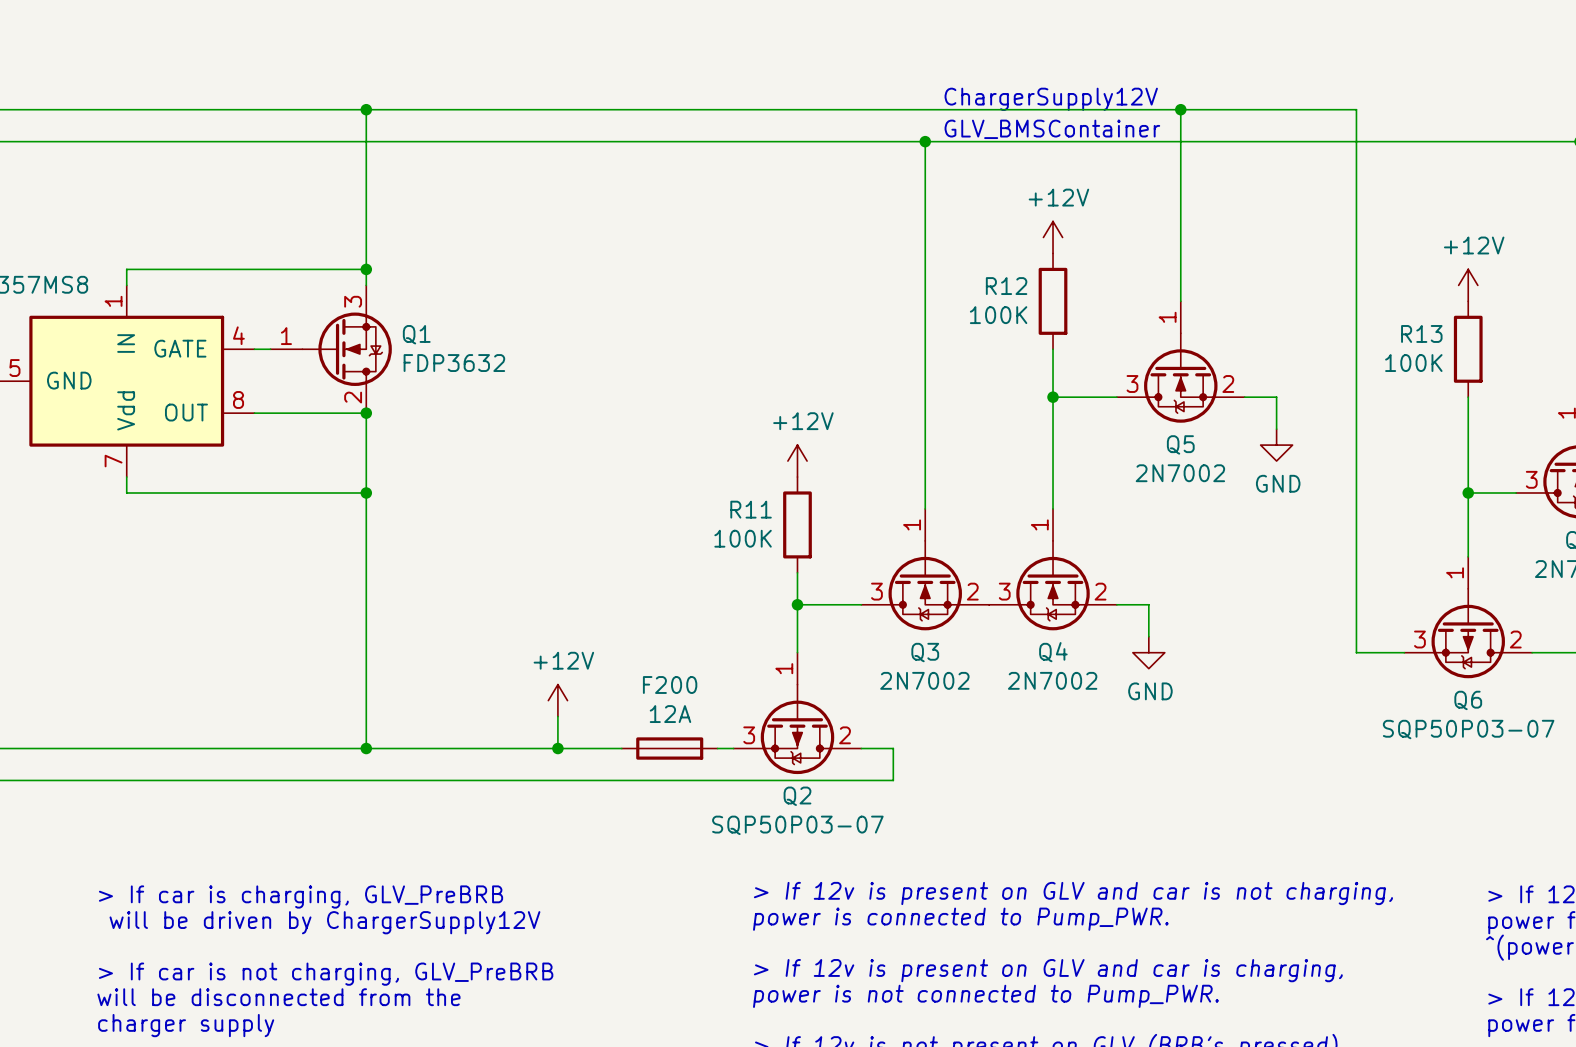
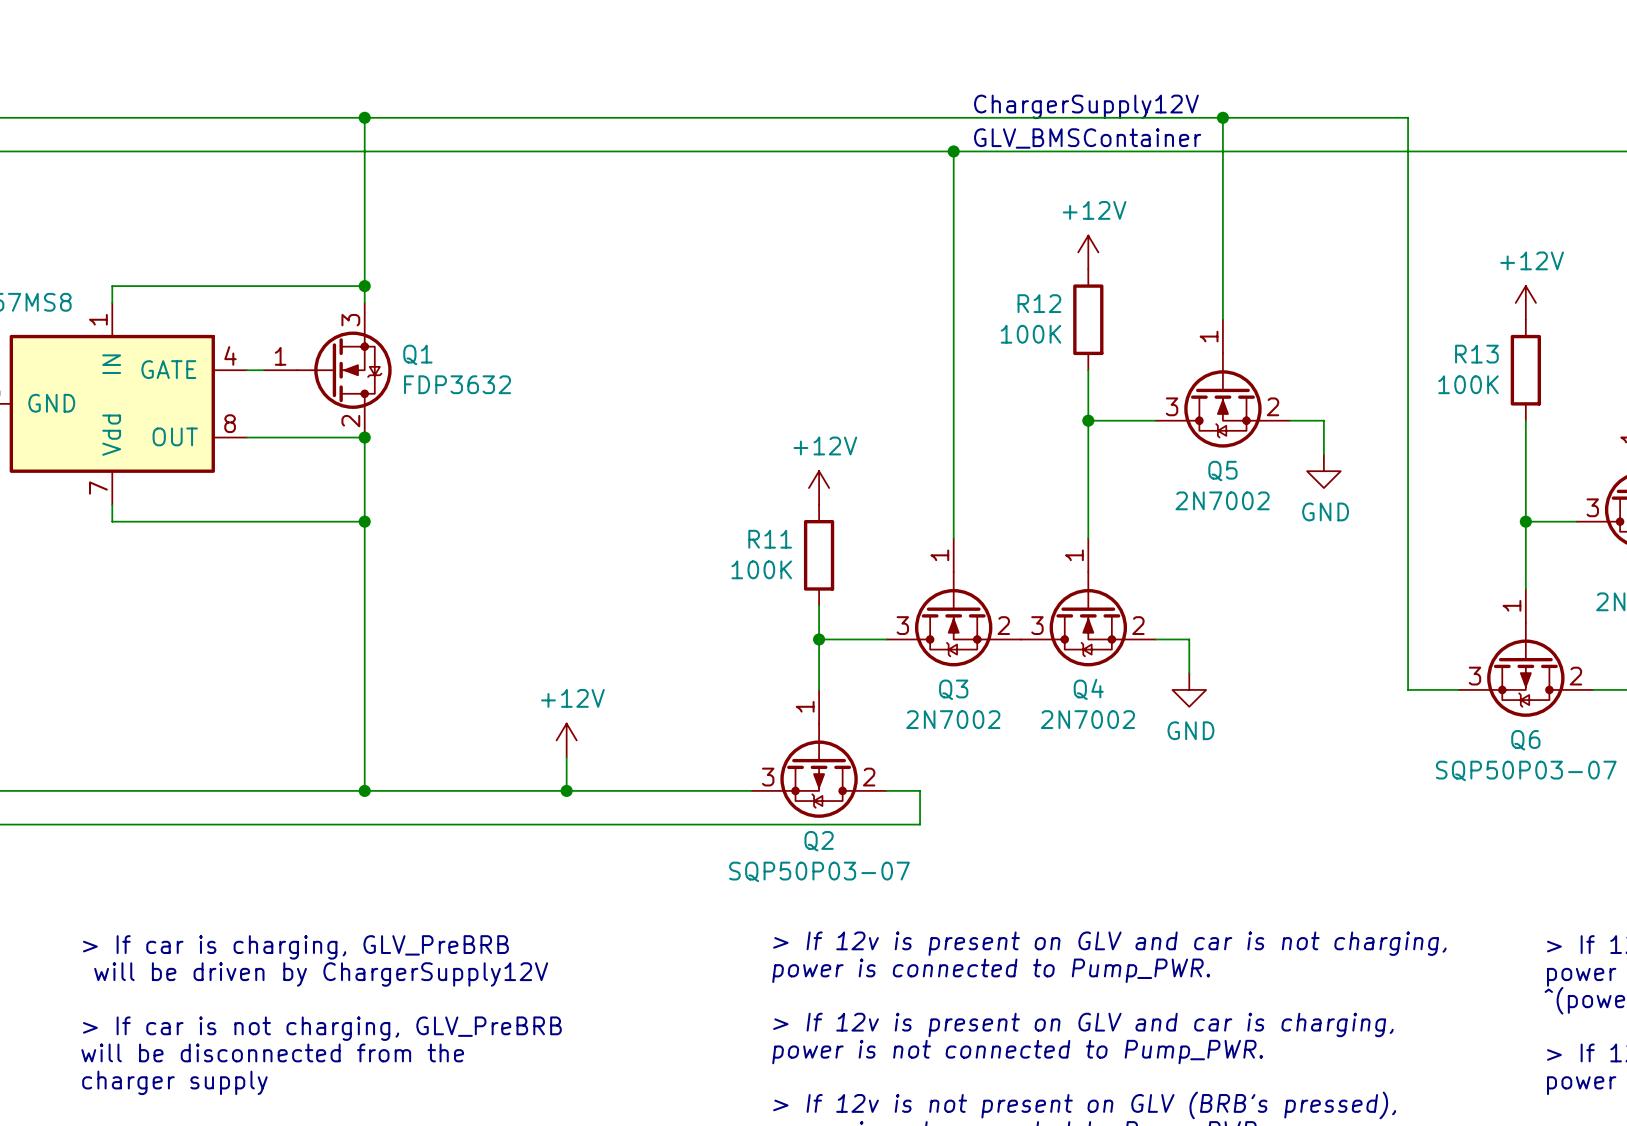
F200: 12A (669, 748) -> none

